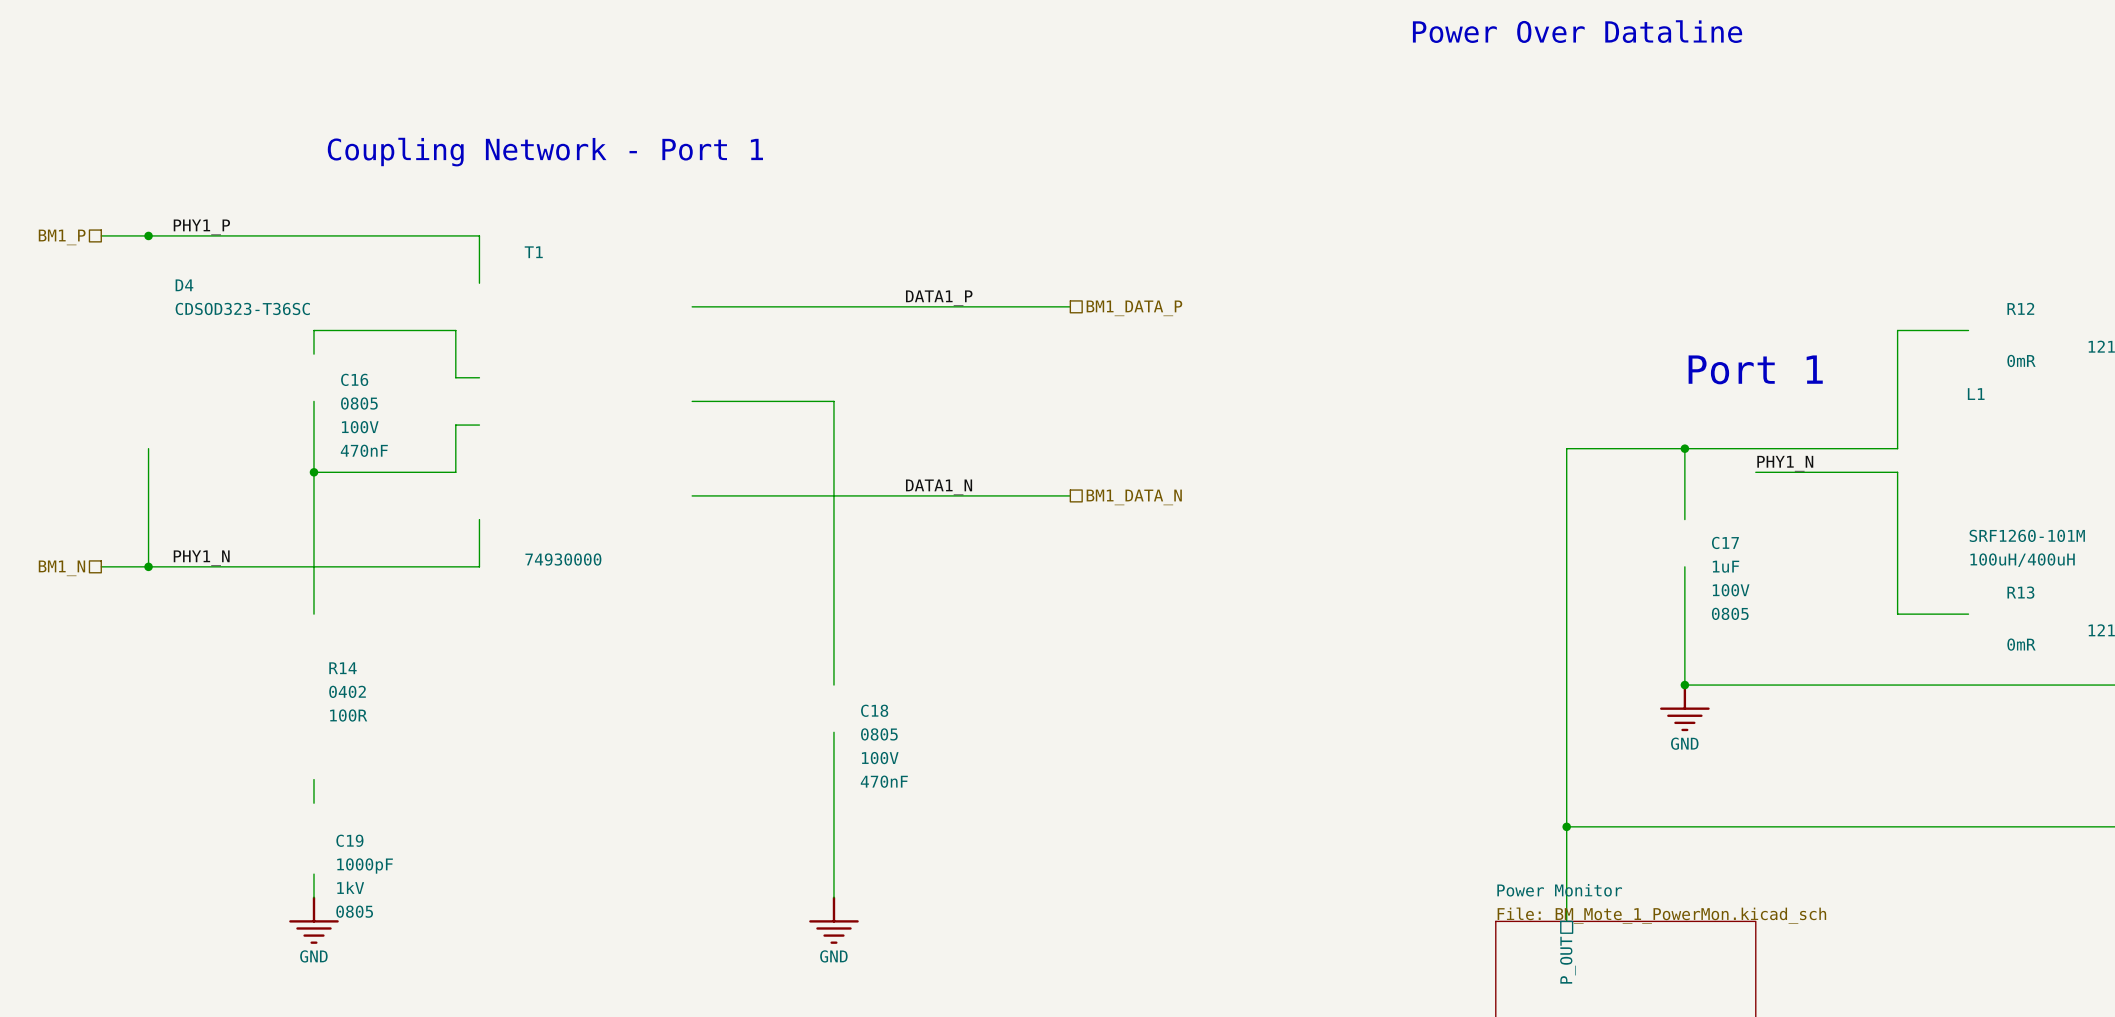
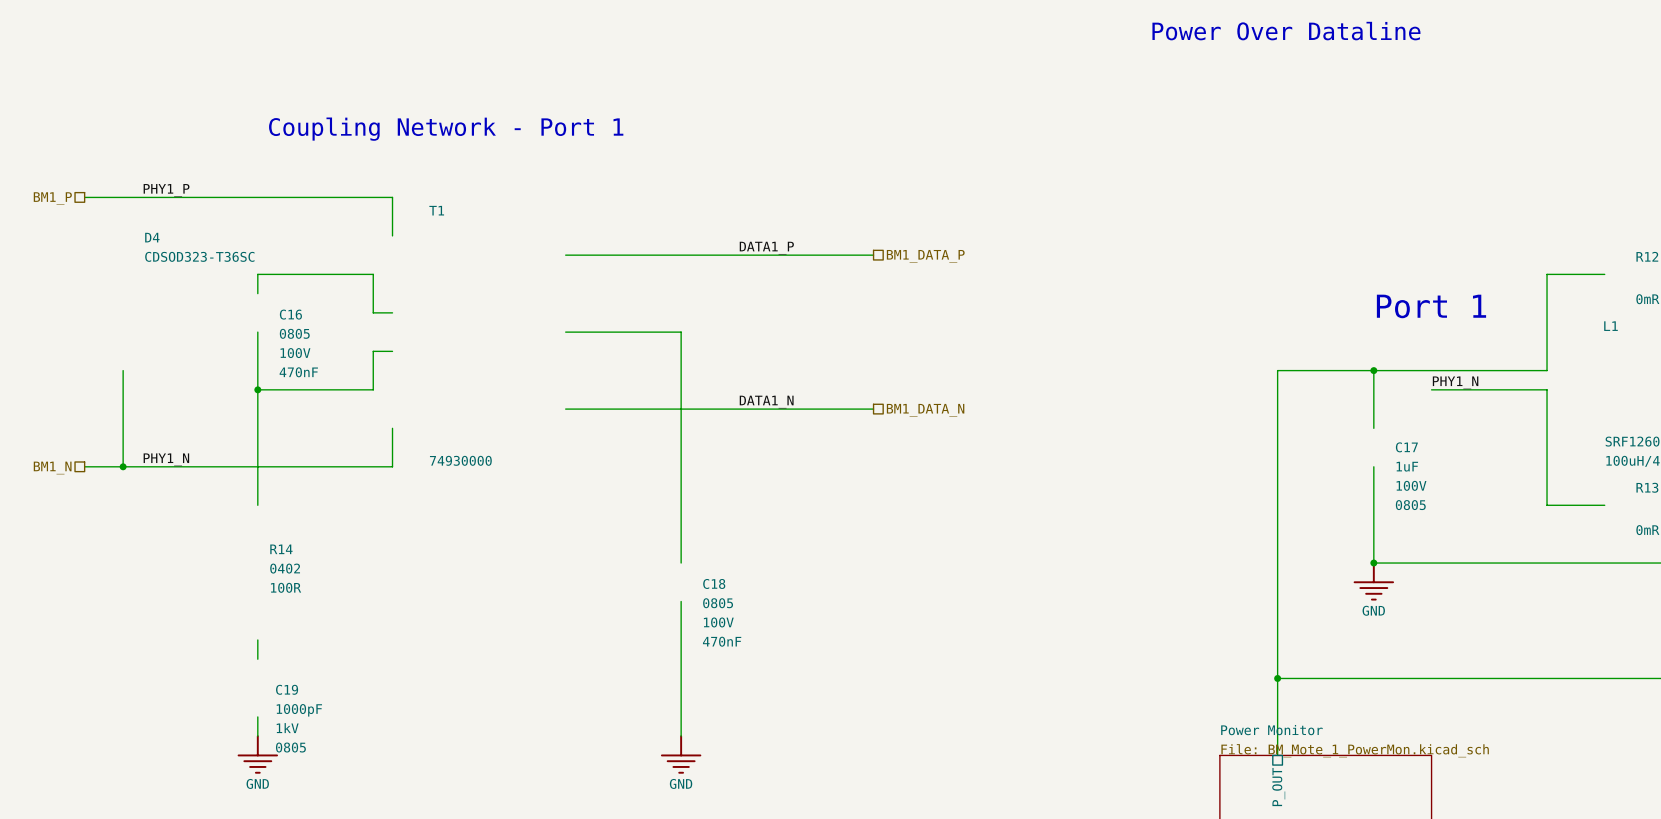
junction: (148, 235) -> none

